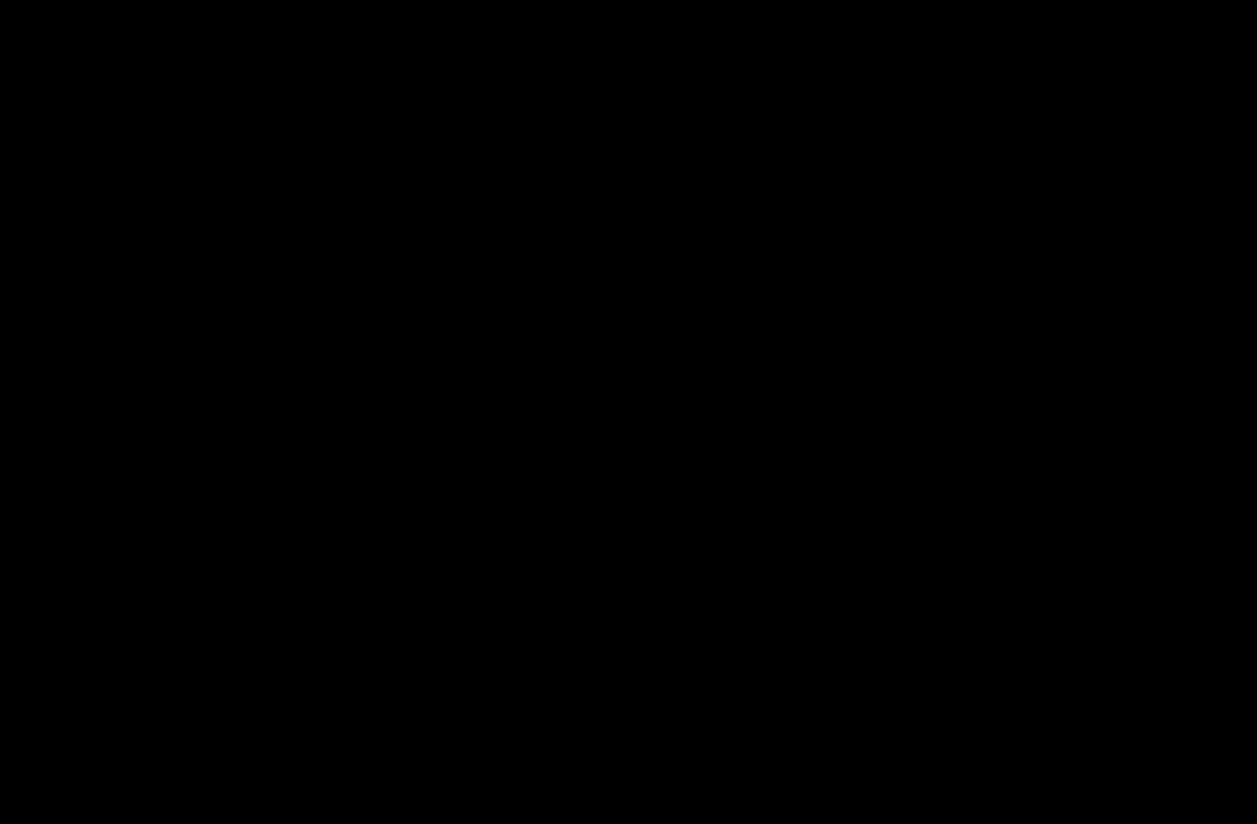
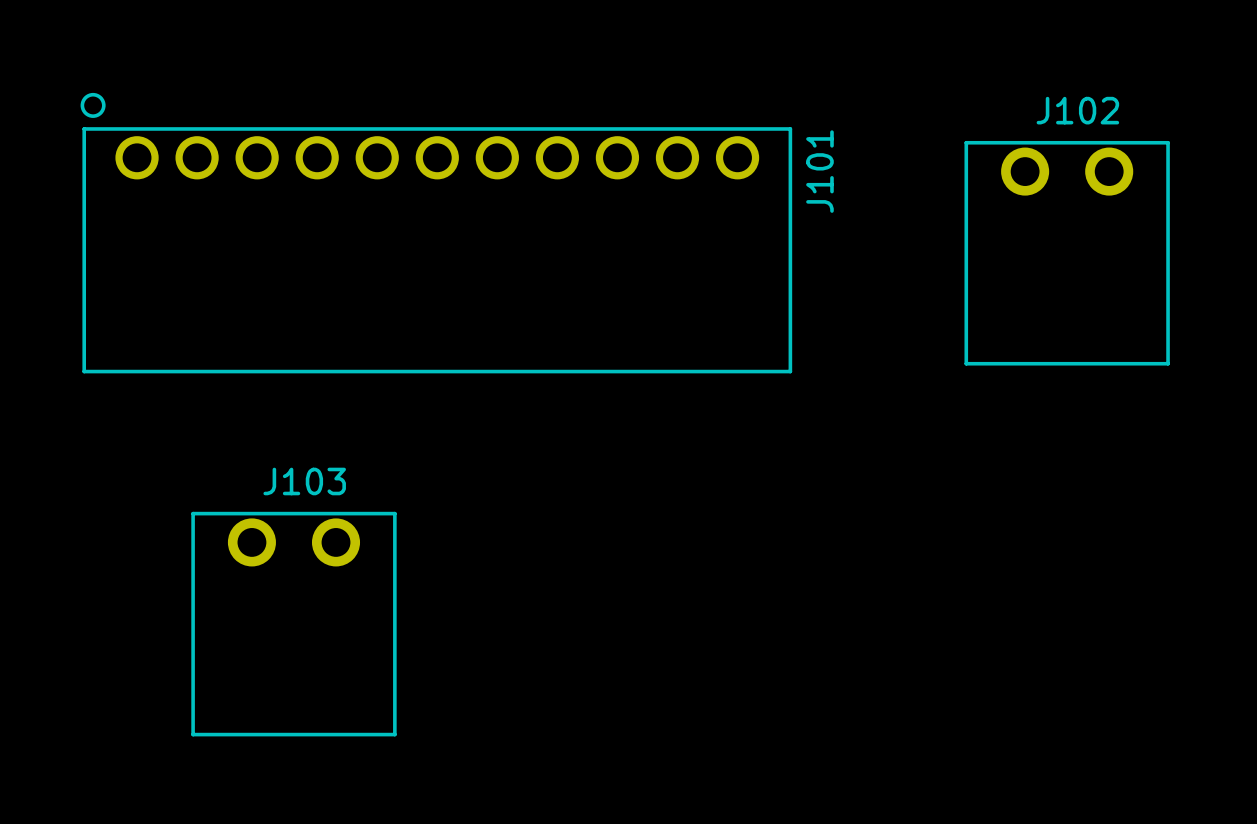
J101: none -> (436, 233)
J102: none -> (1067, 253)
J103: none -> (293, 624)

